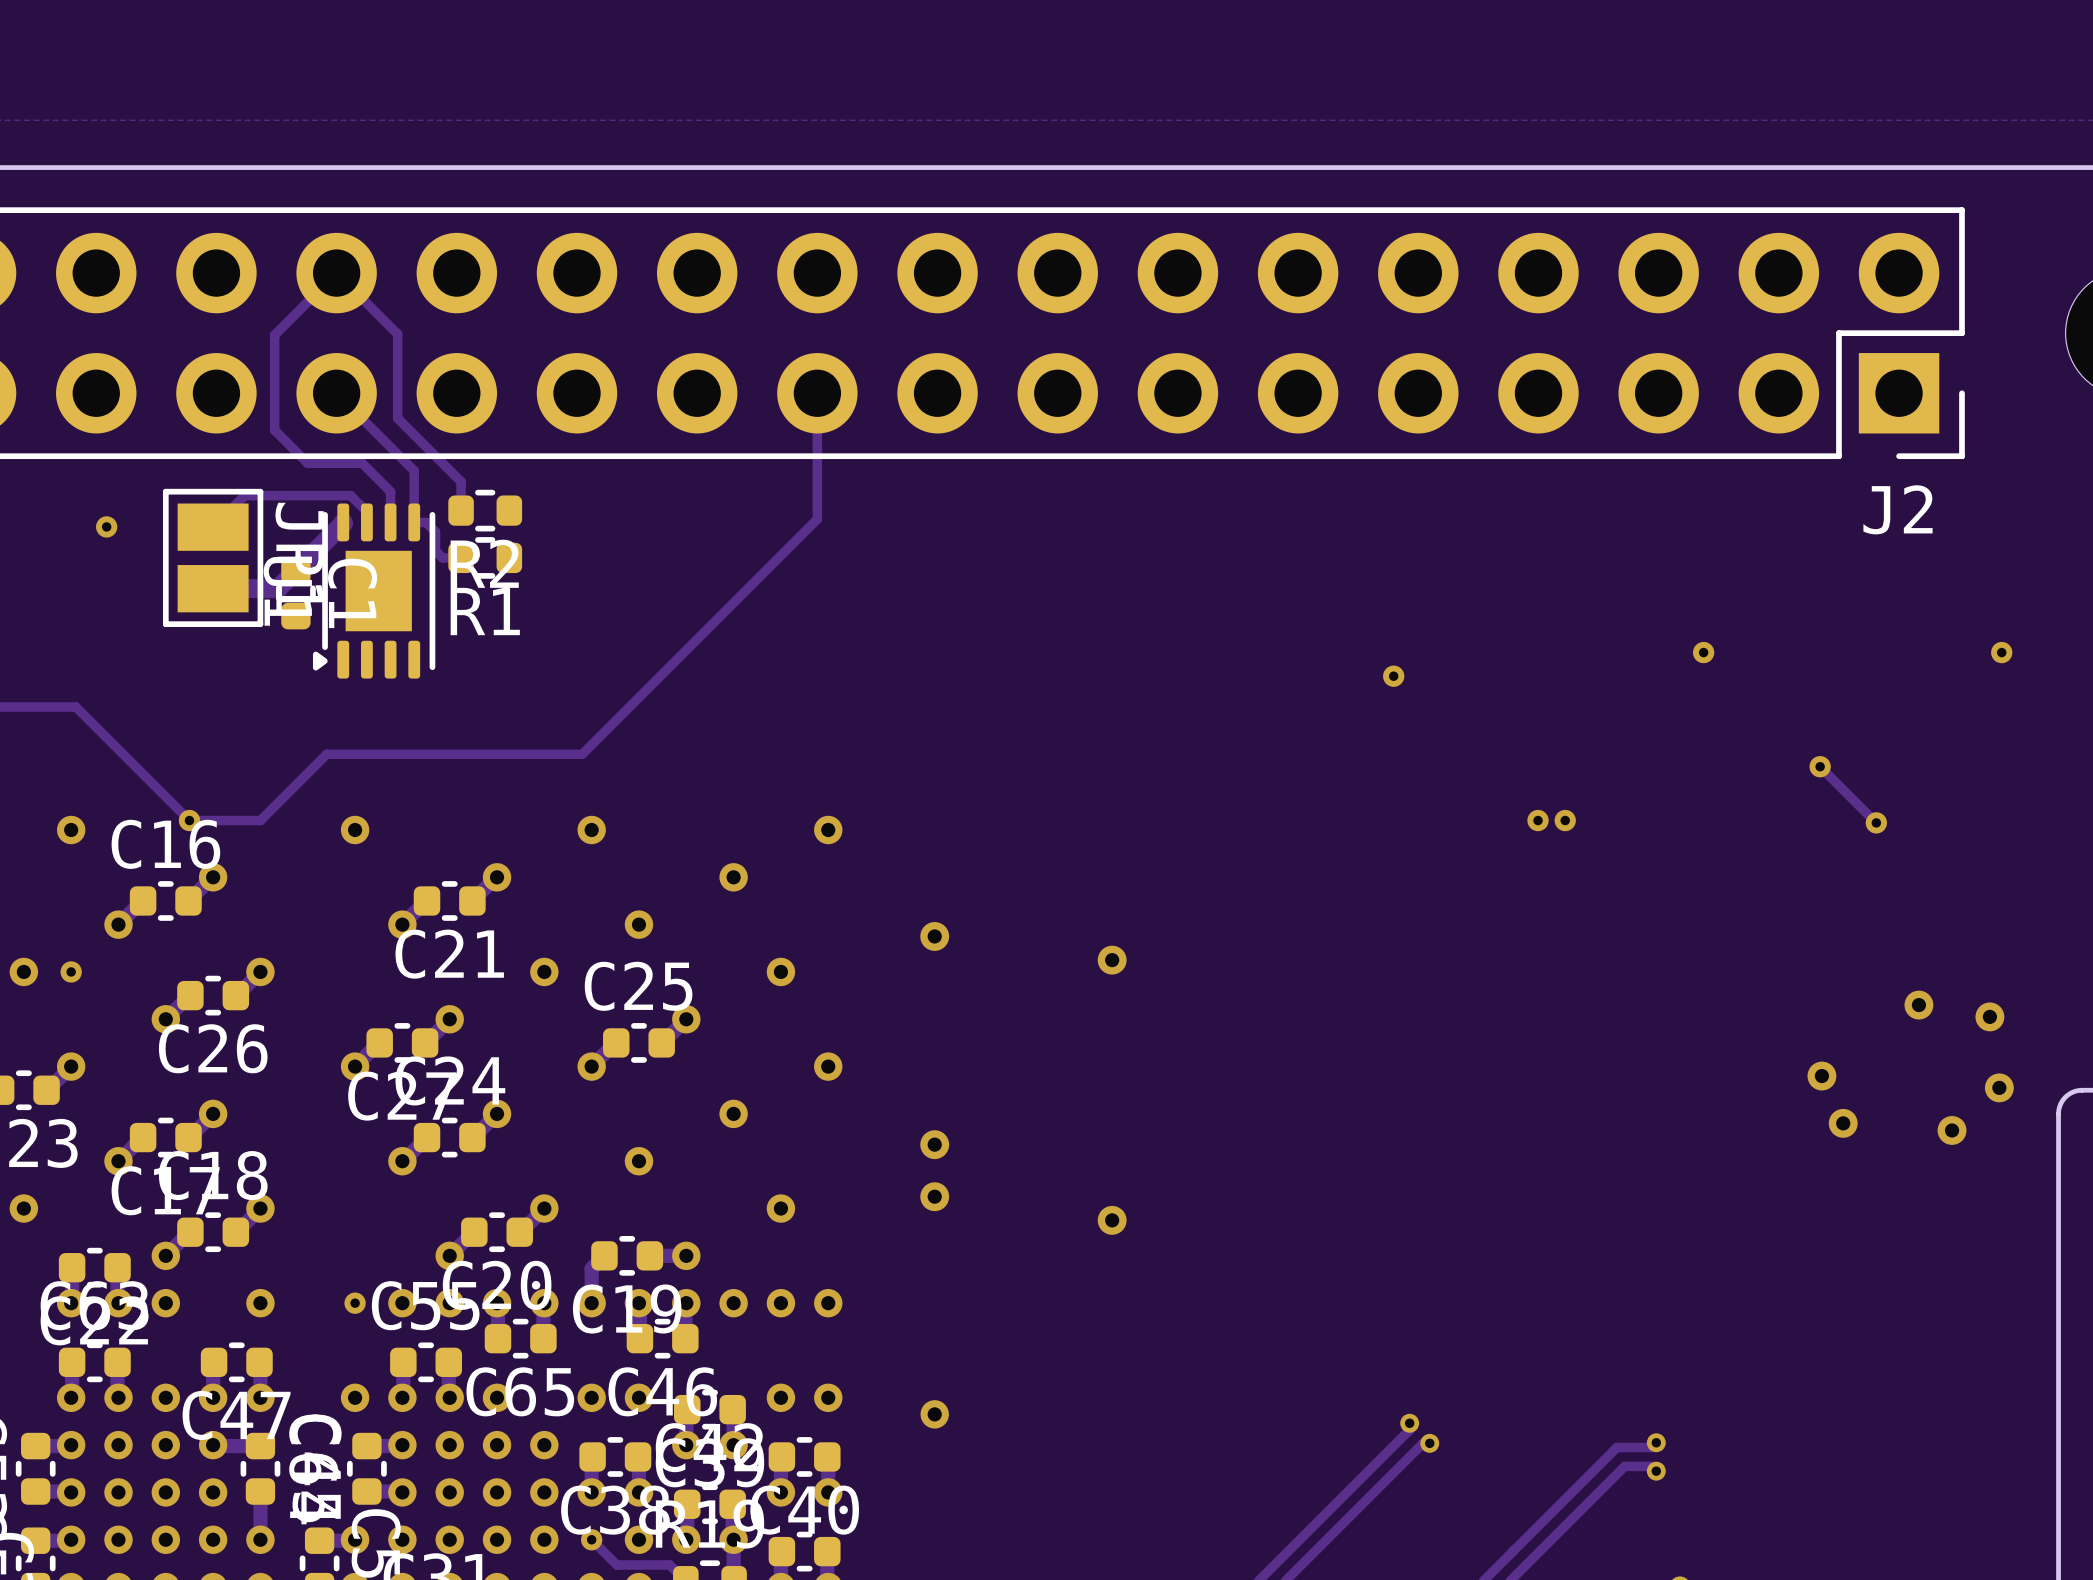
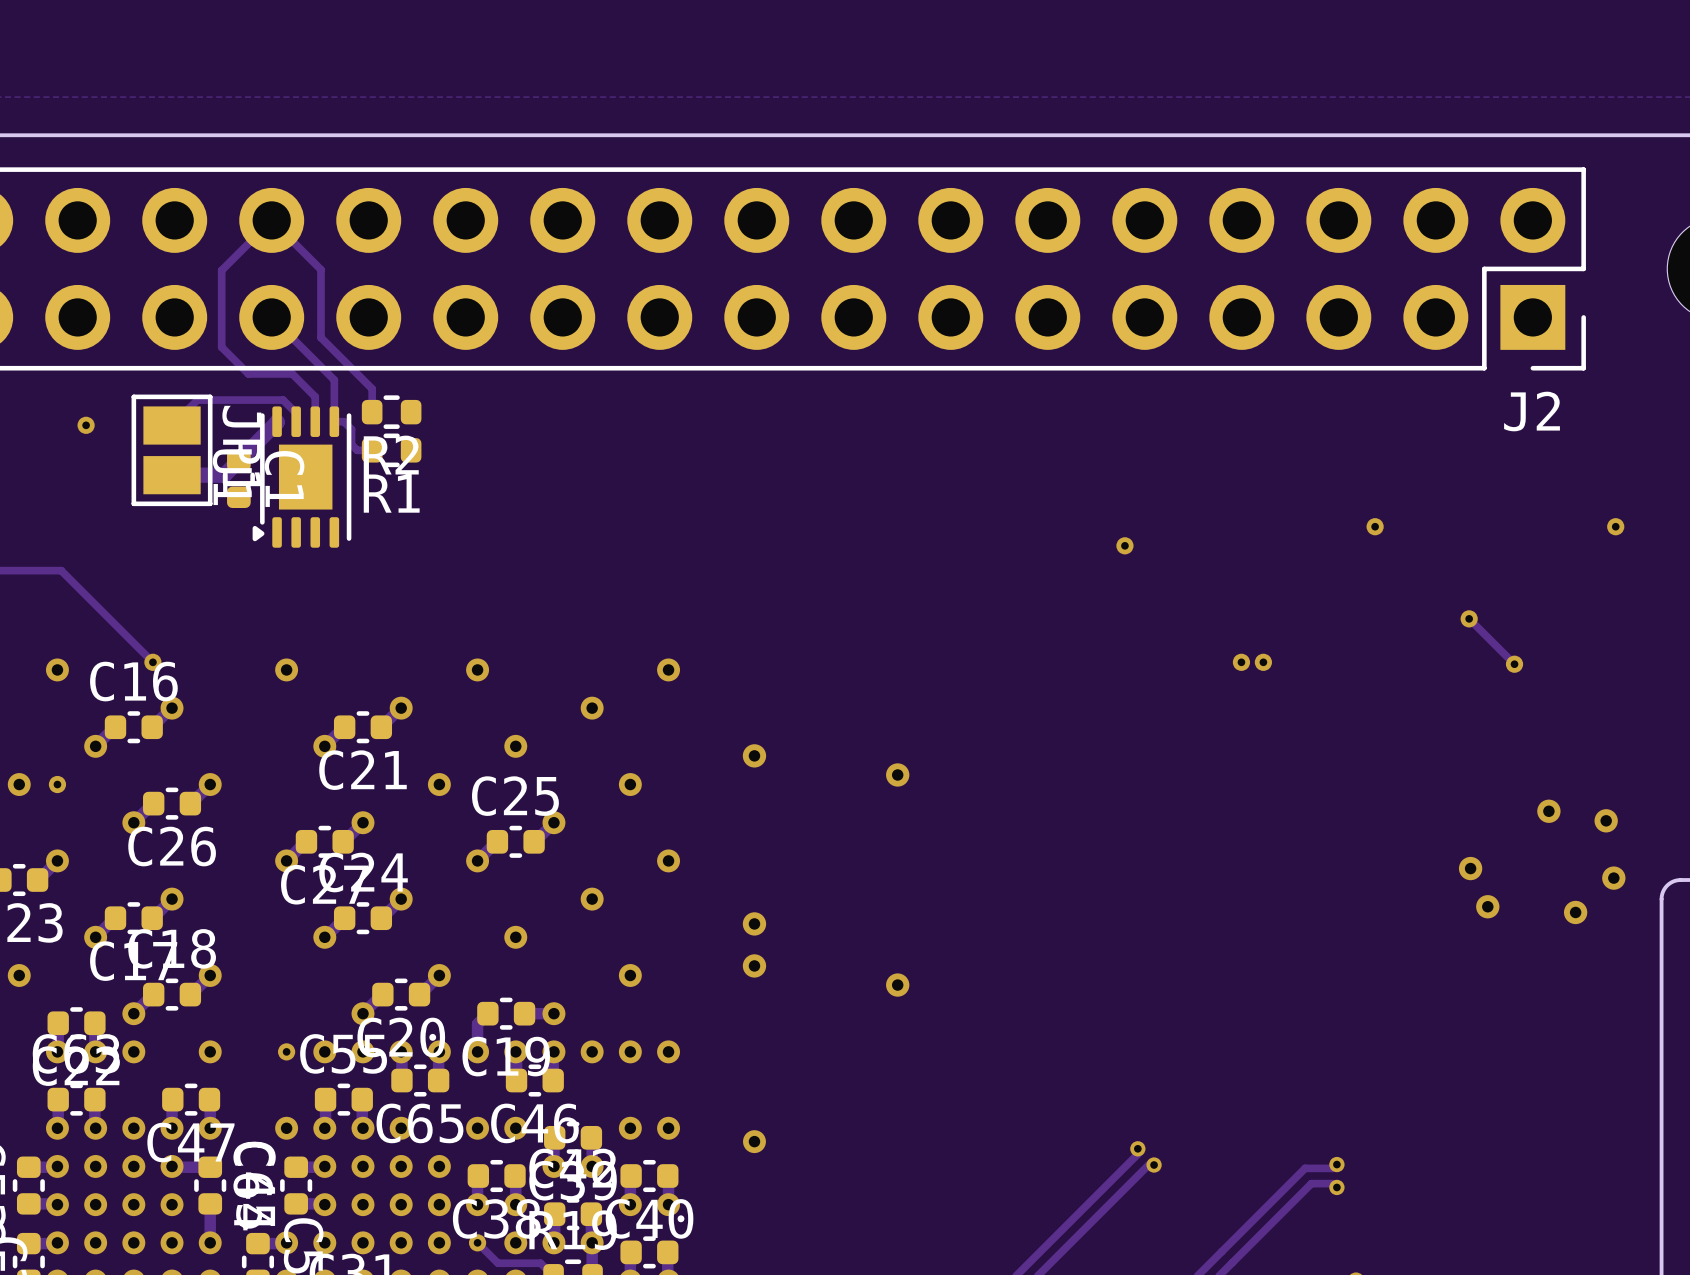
track: (817, 393) (817, 519) (582, 754) (326, 754) (260, 820) (189, 820) -> none

